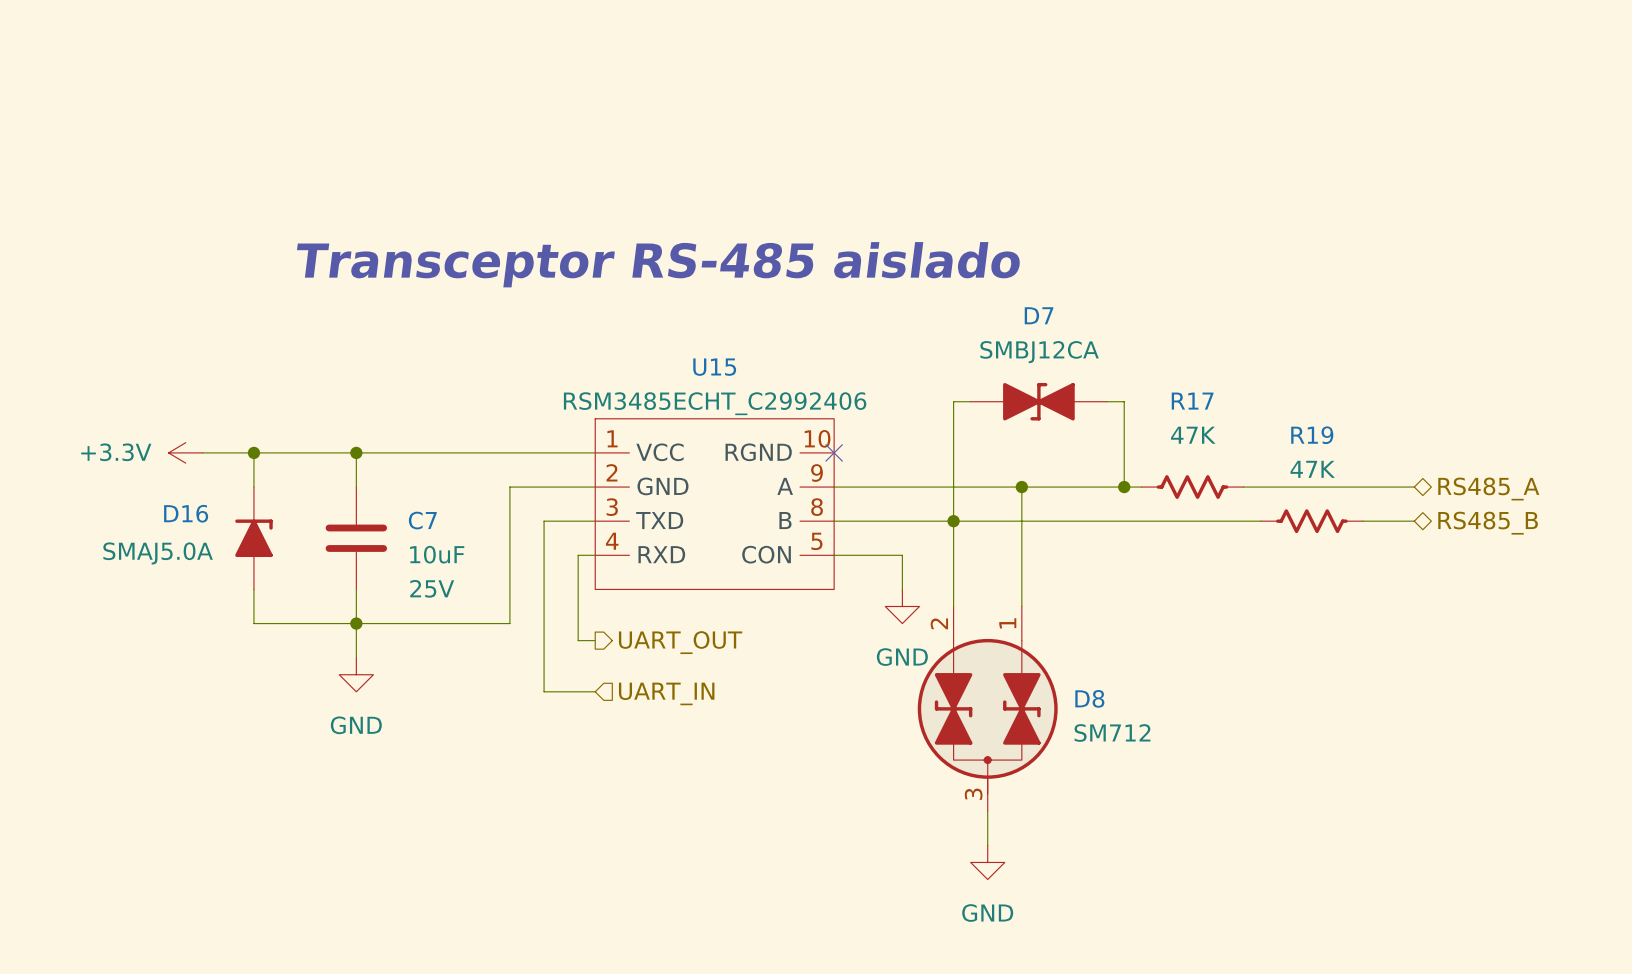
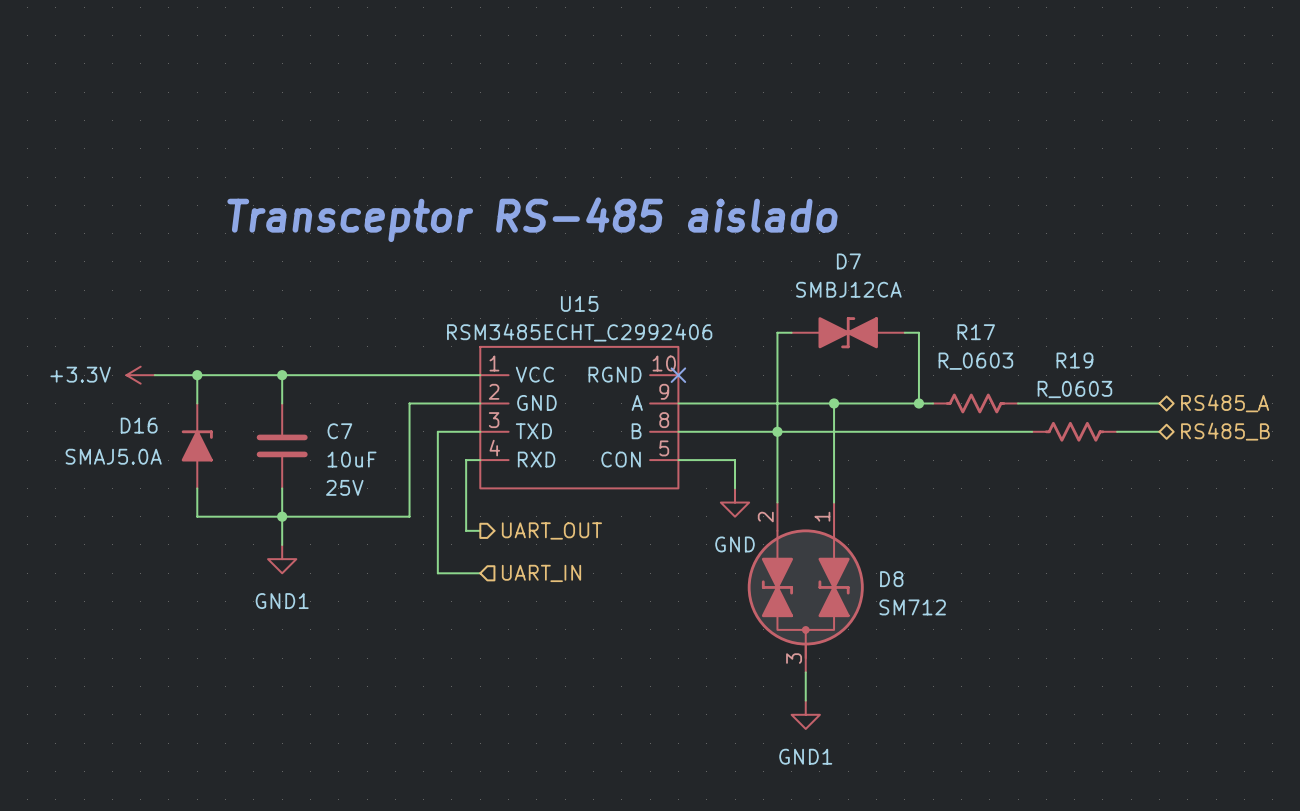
R17 value: 47K (1193, 435) -> R_0603 (975, 361)
R19 value: 47K (1312, 469) -> R_0603 (1074, 389)
power symbol: GND (356, 674) -> GND1 (282, 559)
power symbol: GND (987, 862) -> GND1 (805, 714)

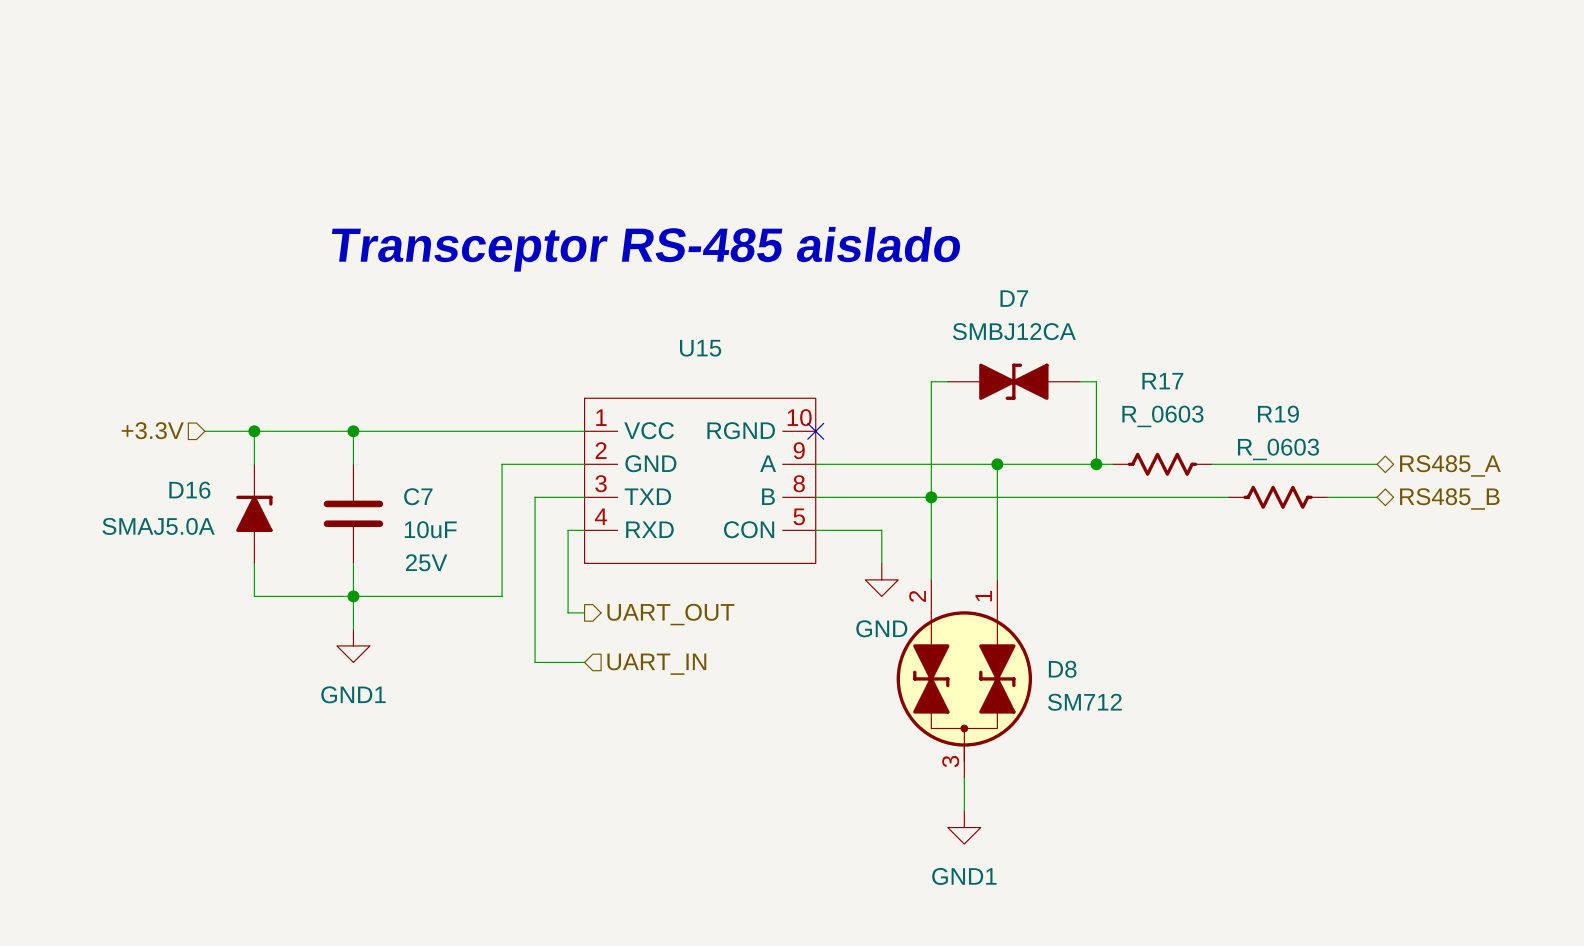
U15 value: RSM3485ECHT_C2992406 (579, 332) -> none
hierarchical label: none -> +3.3V (152, 430)
power symbol: +3.3V (140, 375) -> none

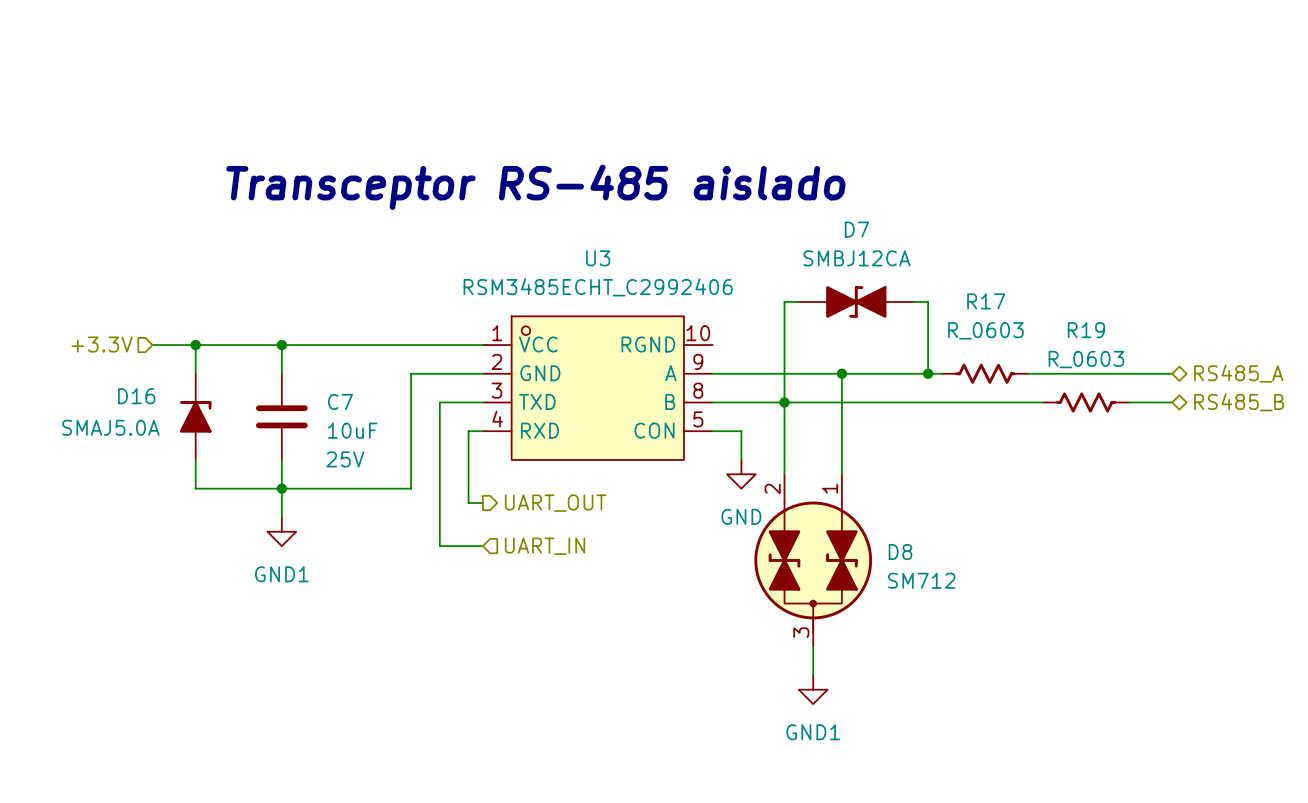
no-connect mark: (815, 431) -> none
U15: (700, 480) -> none
U3: none -> RSM3485ECHT_C2992406 (597, 388)

